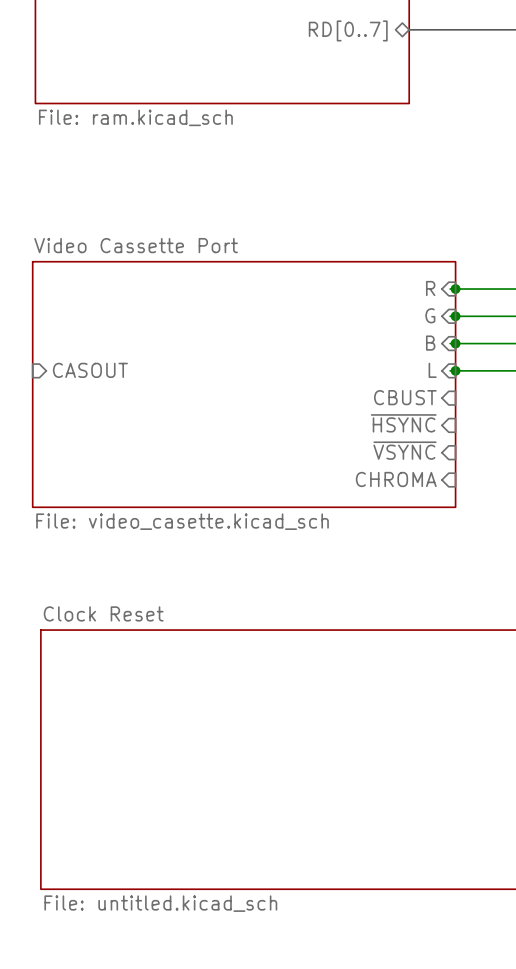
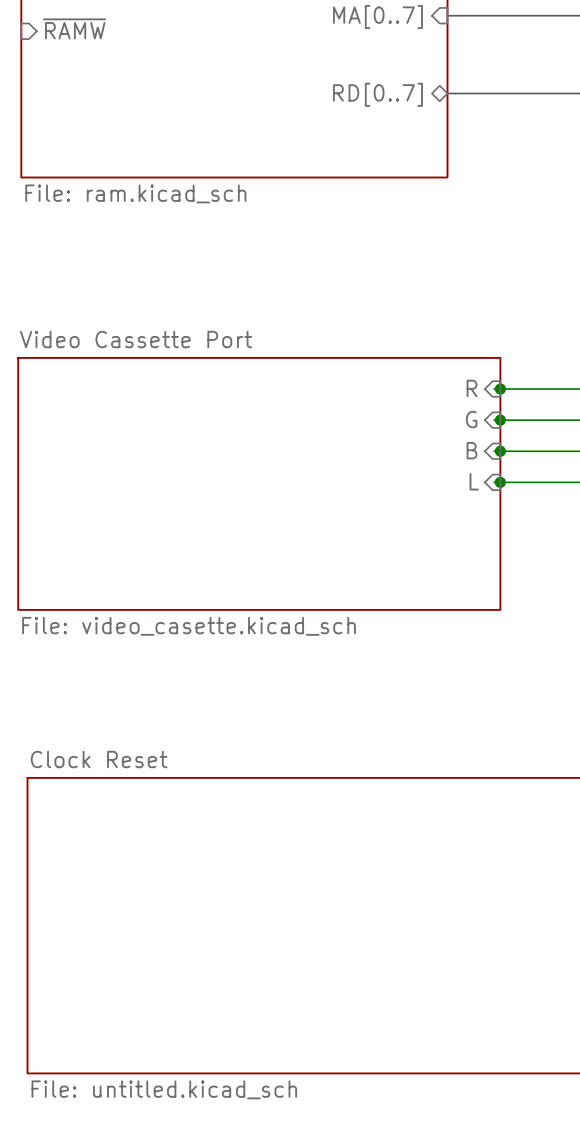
sheet pin: CASOUT (90, 370) -> none
sheet Video Cassette Port: none -> File: video_casette.kicad_sch (259, 483)
sheet Video Cassette Port: File: video_casette.kicad_sch (244, 384) -> none
sheet pin: CBUST (405, 397) -> none
sheet pin: ~{HSYNC} (403, 423) -> none
sheet pin: ~{VSYNC} (404, 450) -> none
sheet pin: CHROMA (396, 479) -> none

